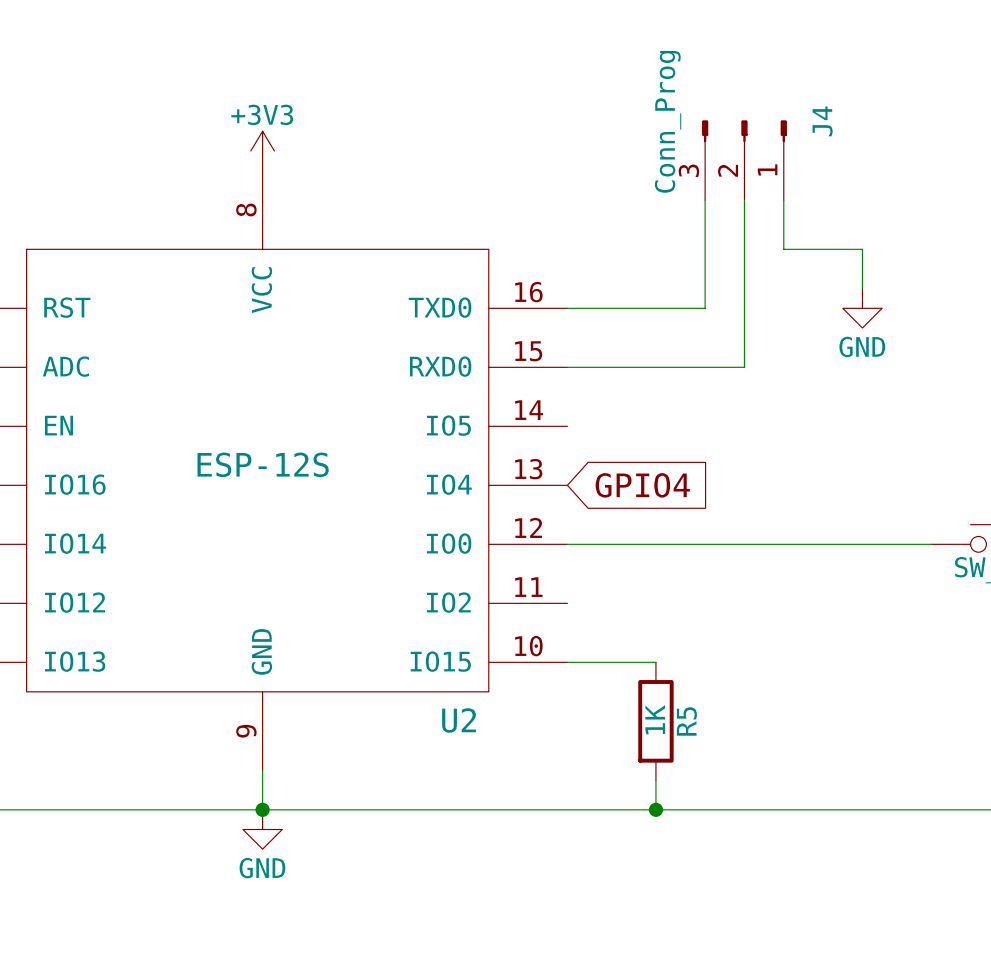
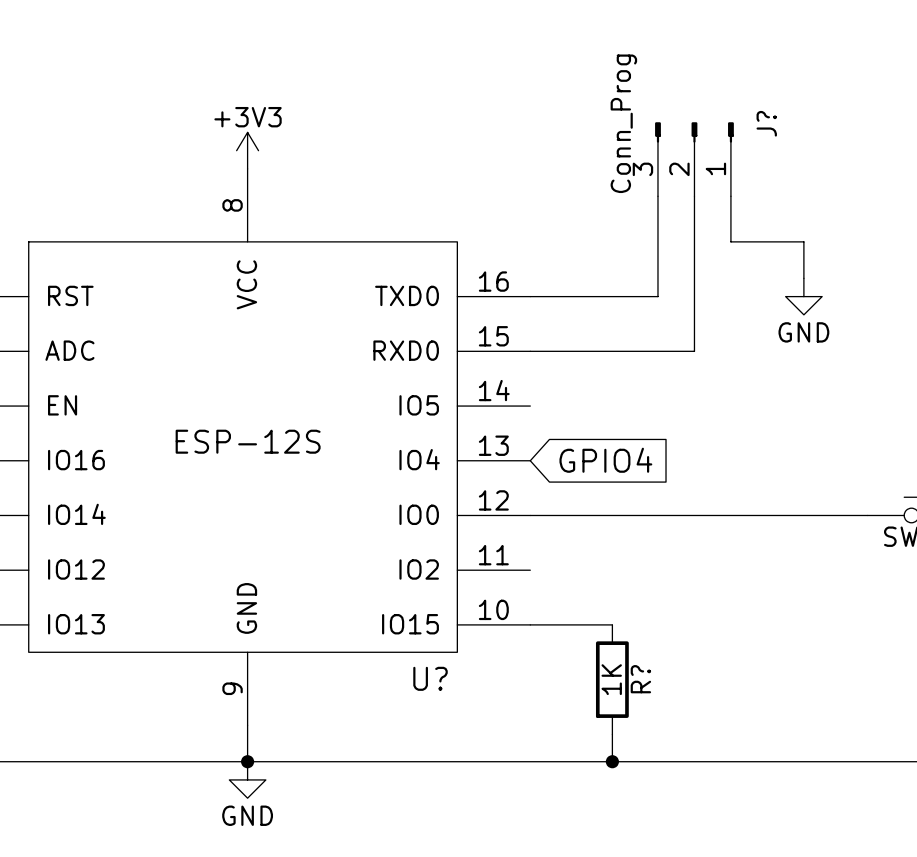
J4 name: J4 (822, 121) -> J? (766, 123)
U2 name: U2 (459, 720) -> U? (430, 678)
R5 name: R5 (686, 721) -> R? (640, 679)

